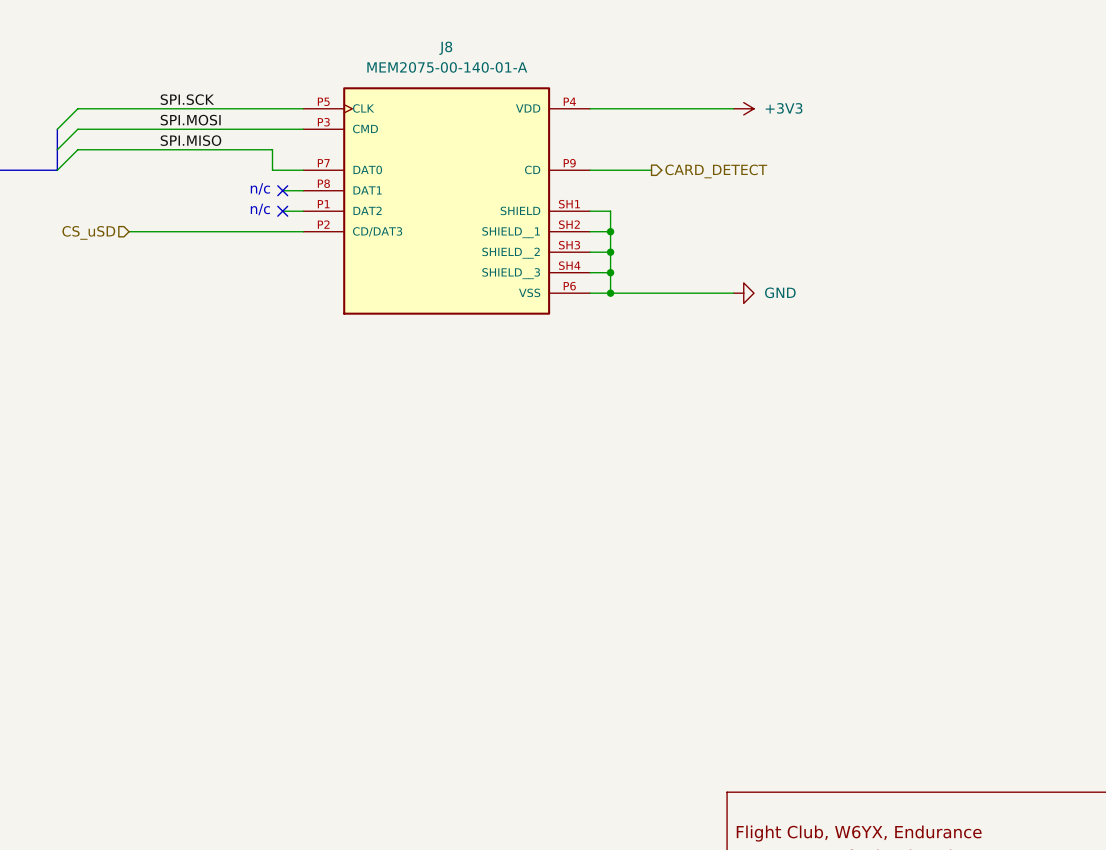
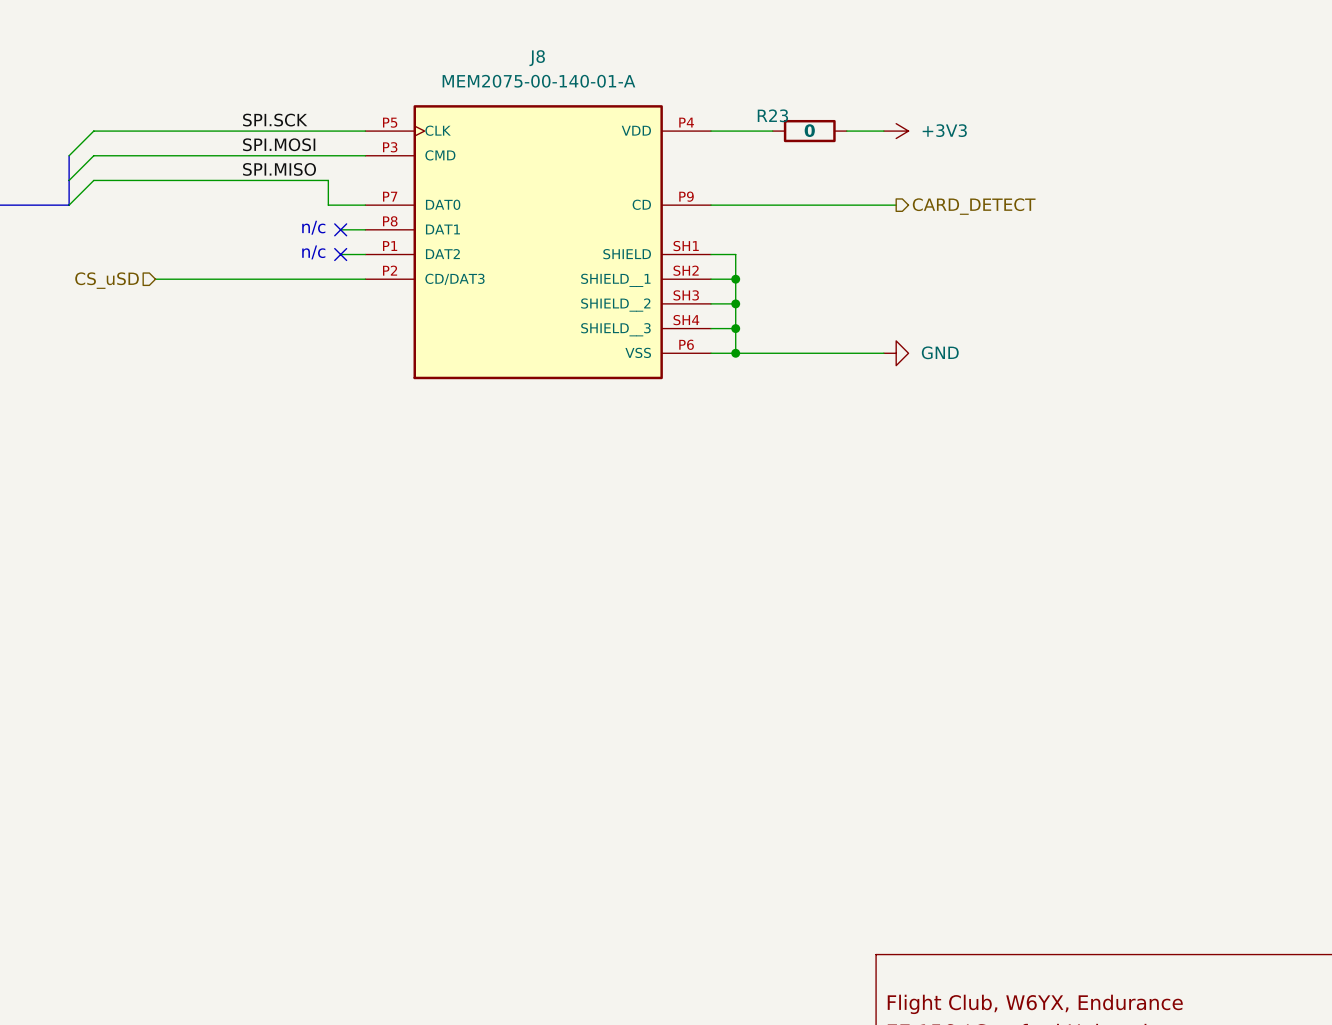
label position: SPI.SCK (187, 99) -> SPI.SCK (275, 120)
wire: (641, 108) (702, 108) -> none
R23: none -> 0 (809, 131)
label position: SPI.MOSI (190, 120) -> SPI.MOSI (279, 144)
label position: SPI.MISO (190, 140) -> SPI.MISO (279, 169)
wire: none -> (785, 205) (896, 205)
hierarchical label position: CARD_DETECT (716, 171) -> CARD_DETECT (974, 206)

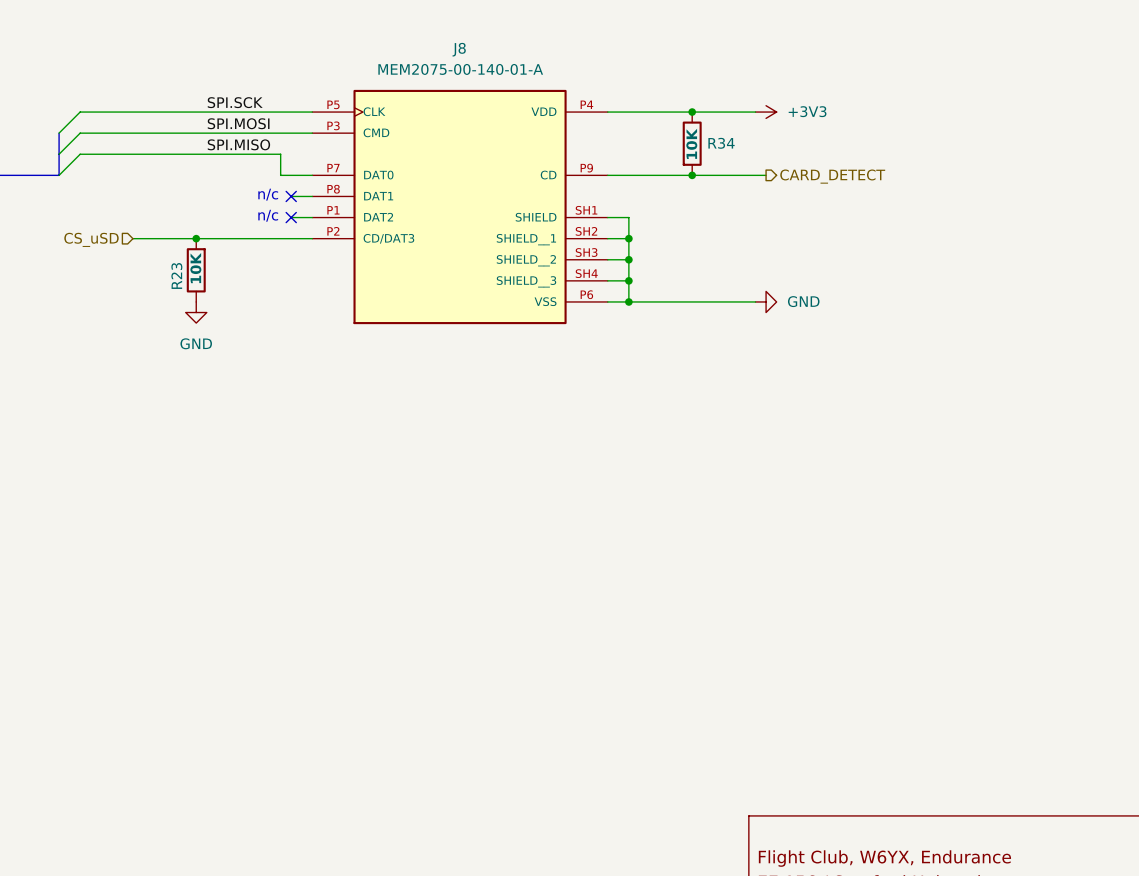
R23 name position: R23 (772, 115) -> R23 (176, 275)
R23 value: 0 (809, 130) -> 10K (195, 268)
wire: none -> (660, 112) (723, 112)
R23 rotation: 0° (809, 131) -> 90° clockwise (196, 270)
R23 position: (809, 131) -> (196, 270)
junction: none -> (692, 112)
R34: none -> 10K (692, 143)
junction: none -> (692, 175)
junction: none -> (196, 238)
power symbol: none -> GND (196, 312)

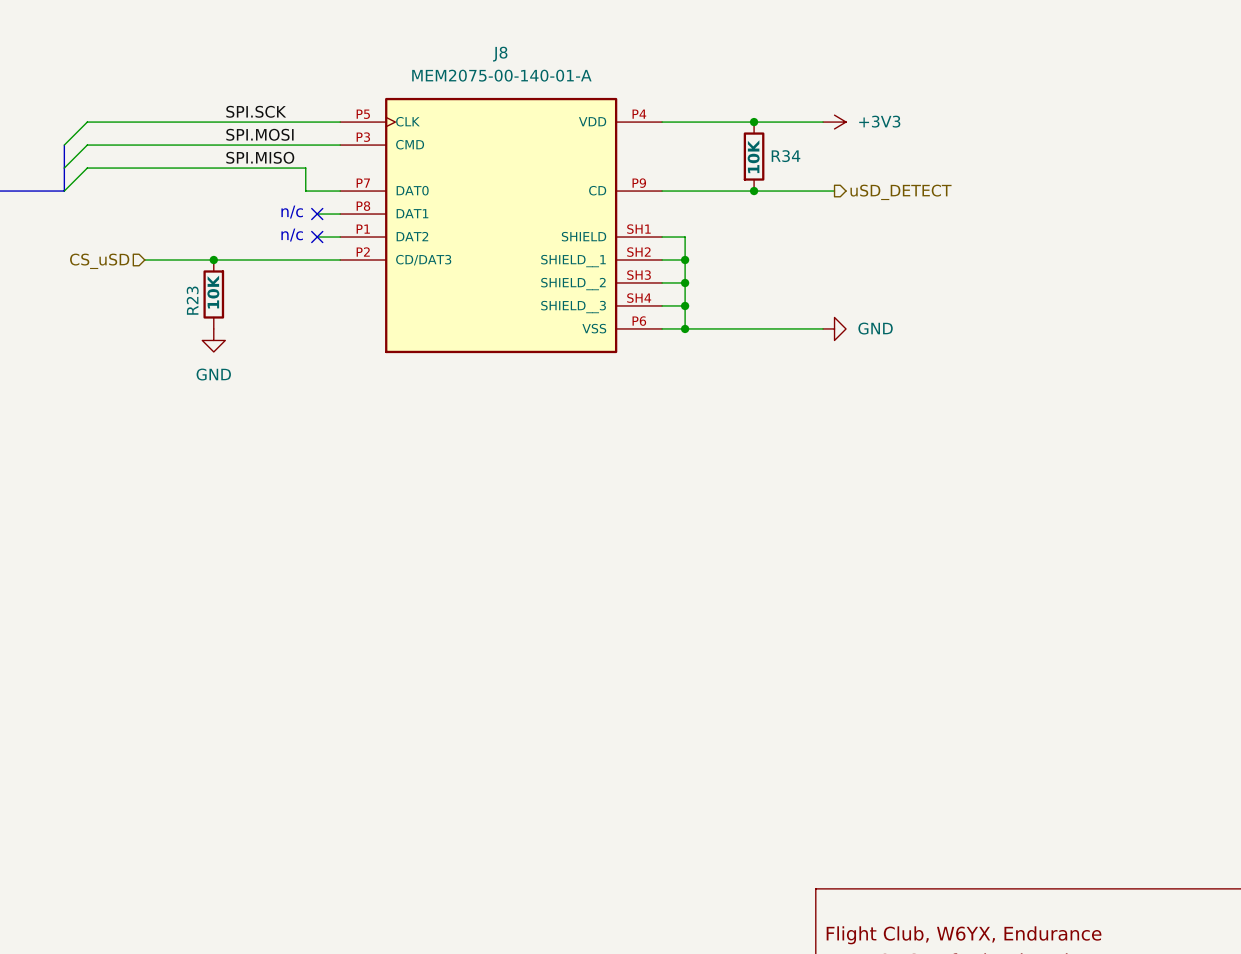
hierarchical label: CARD_DETECT (832, 176) -> uSD_DETECT (901, 192)

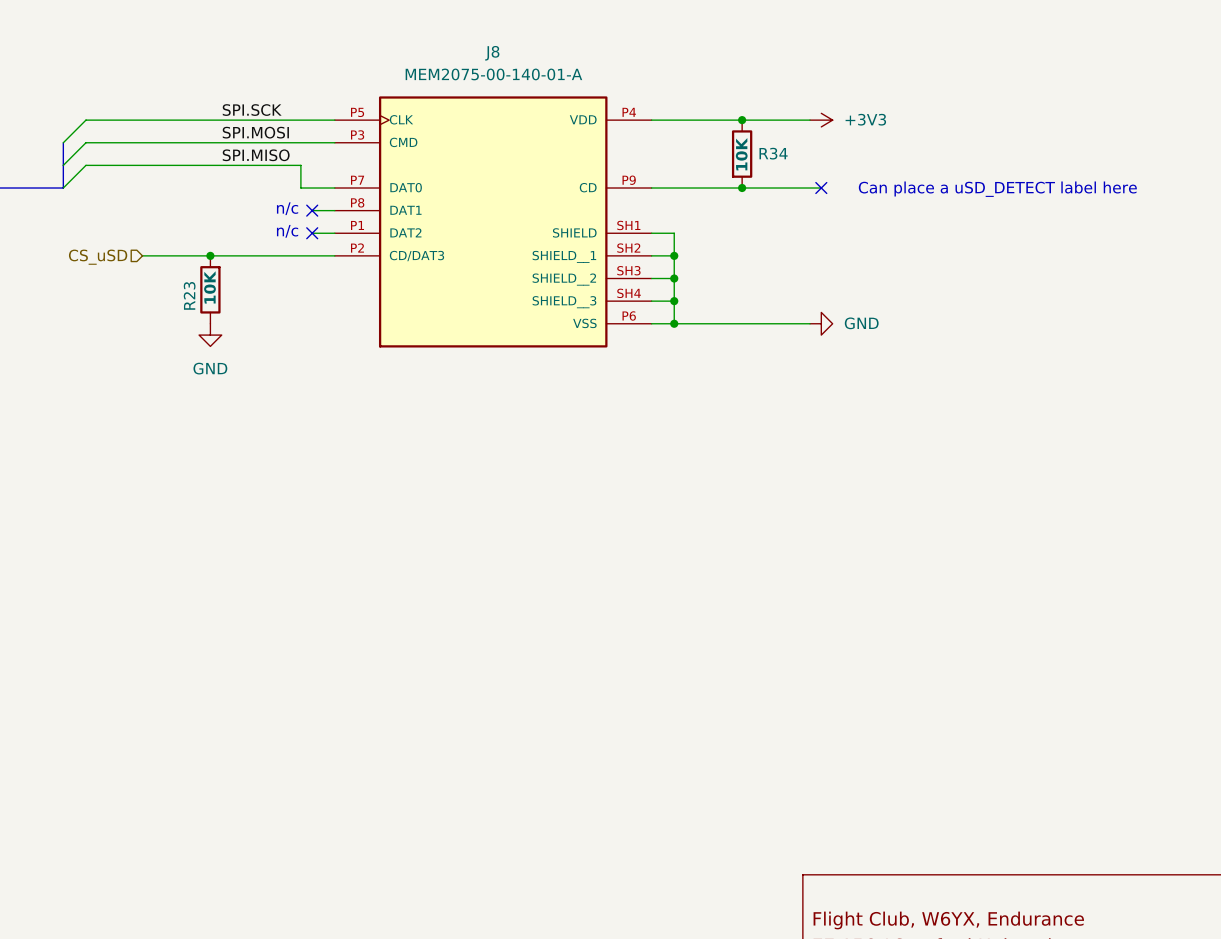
no-connect mark: none -> (821, 188)
hierarchical label: uSD_DETECT (901, 192) -> none
text: none -> Can place a uSD_DETECT label here (997, 189)

